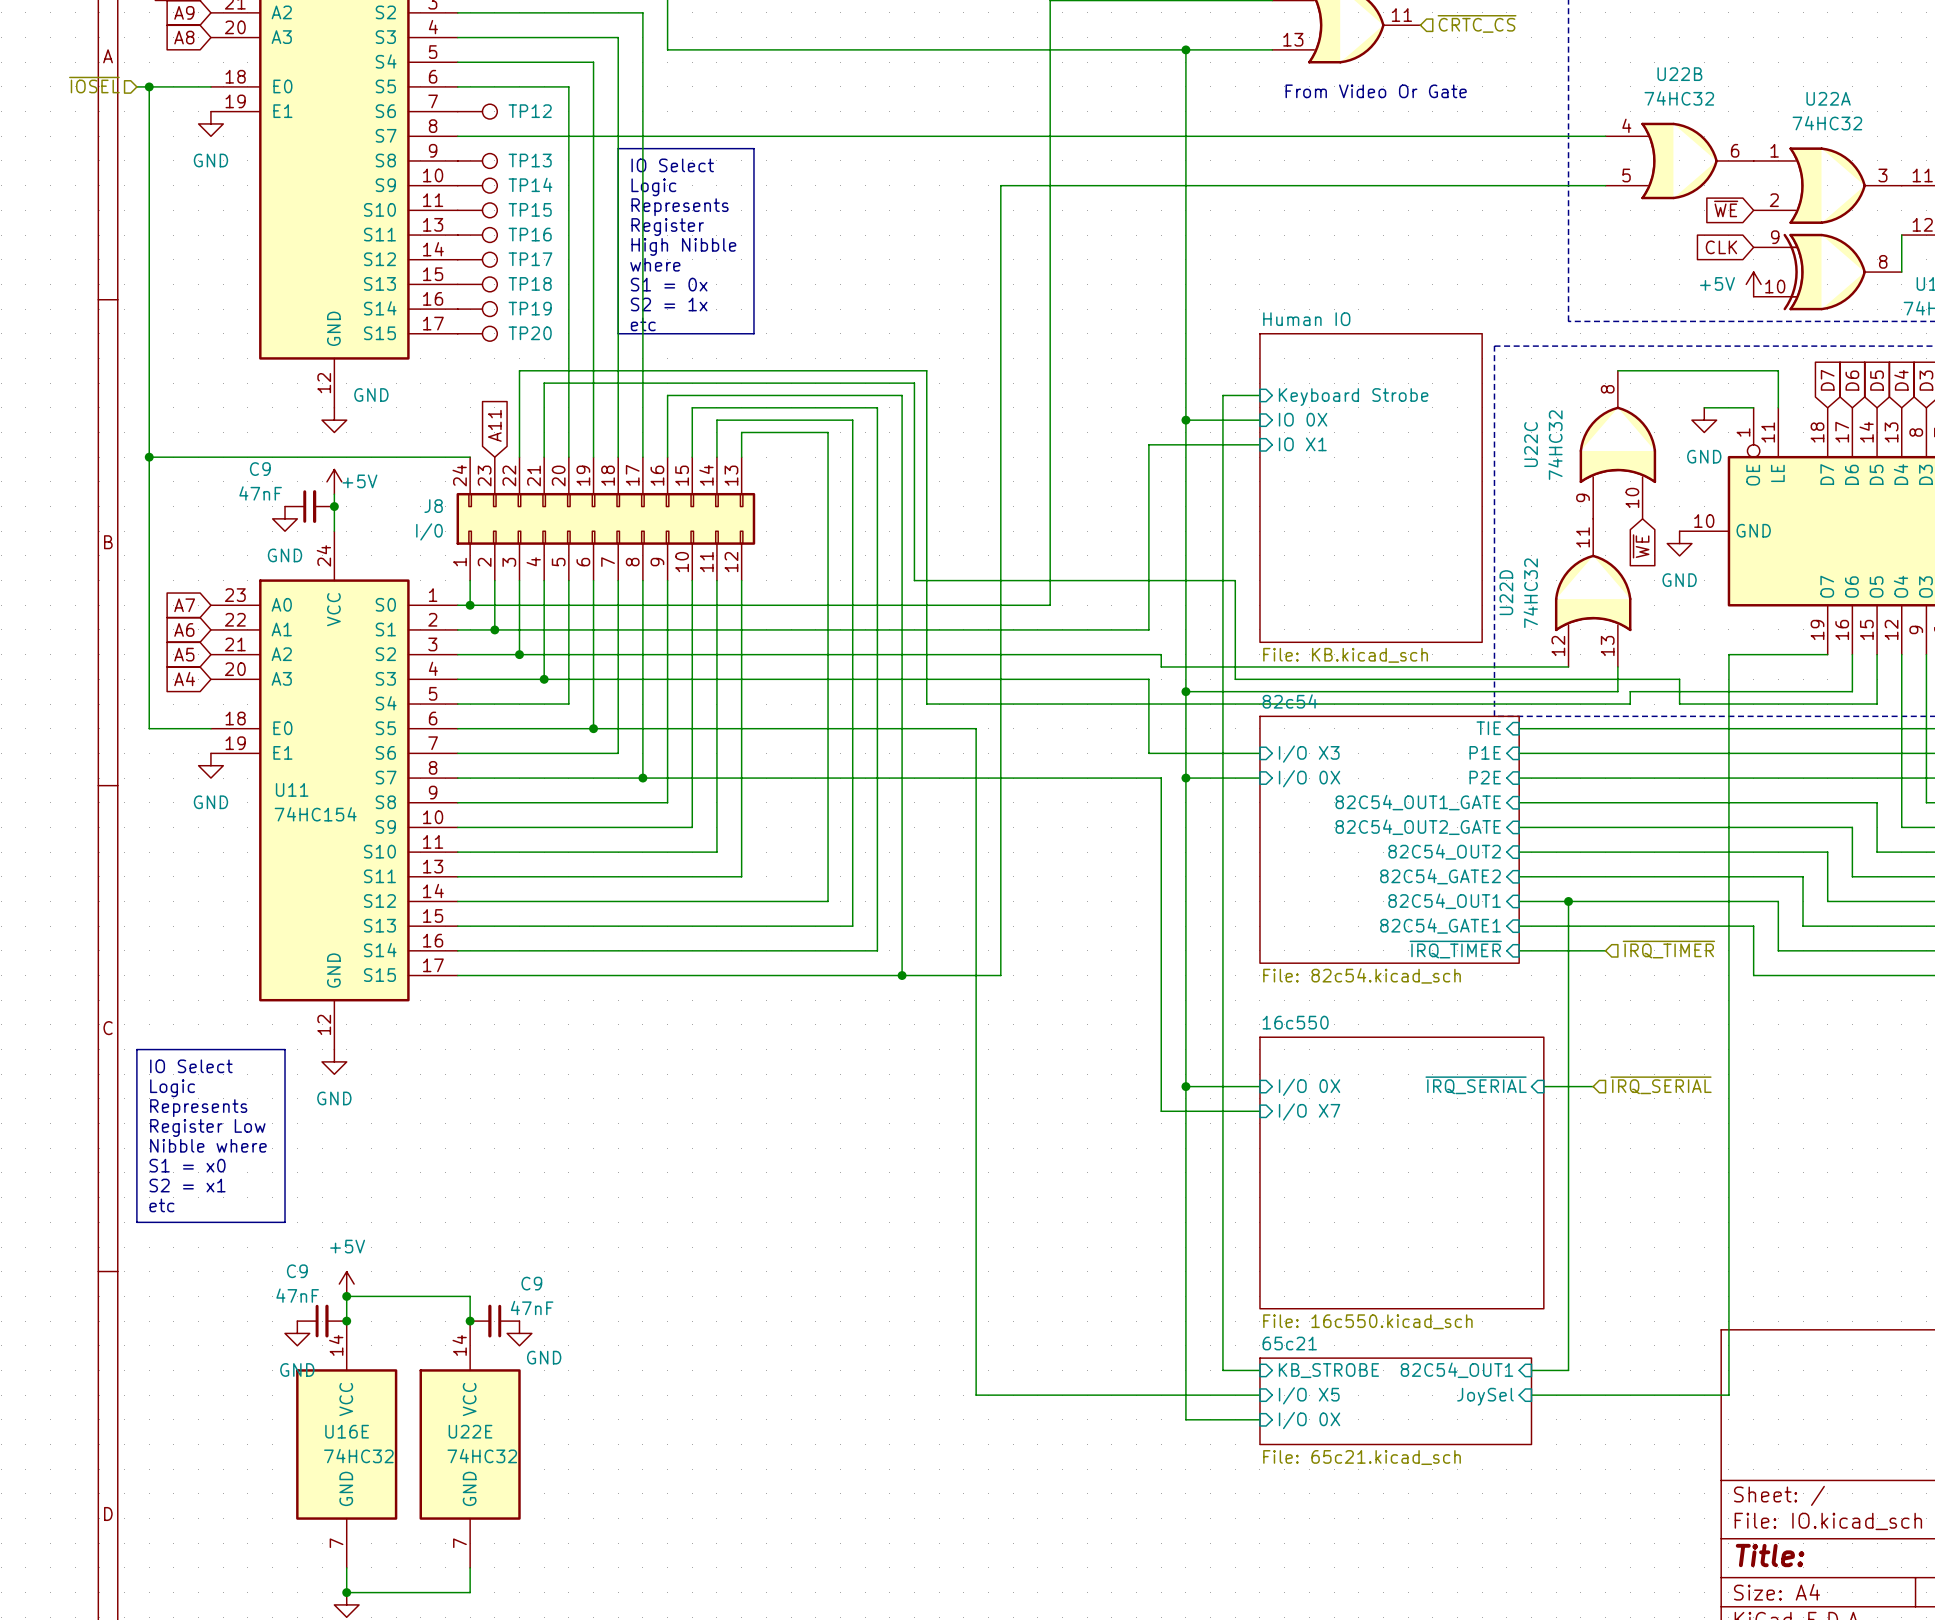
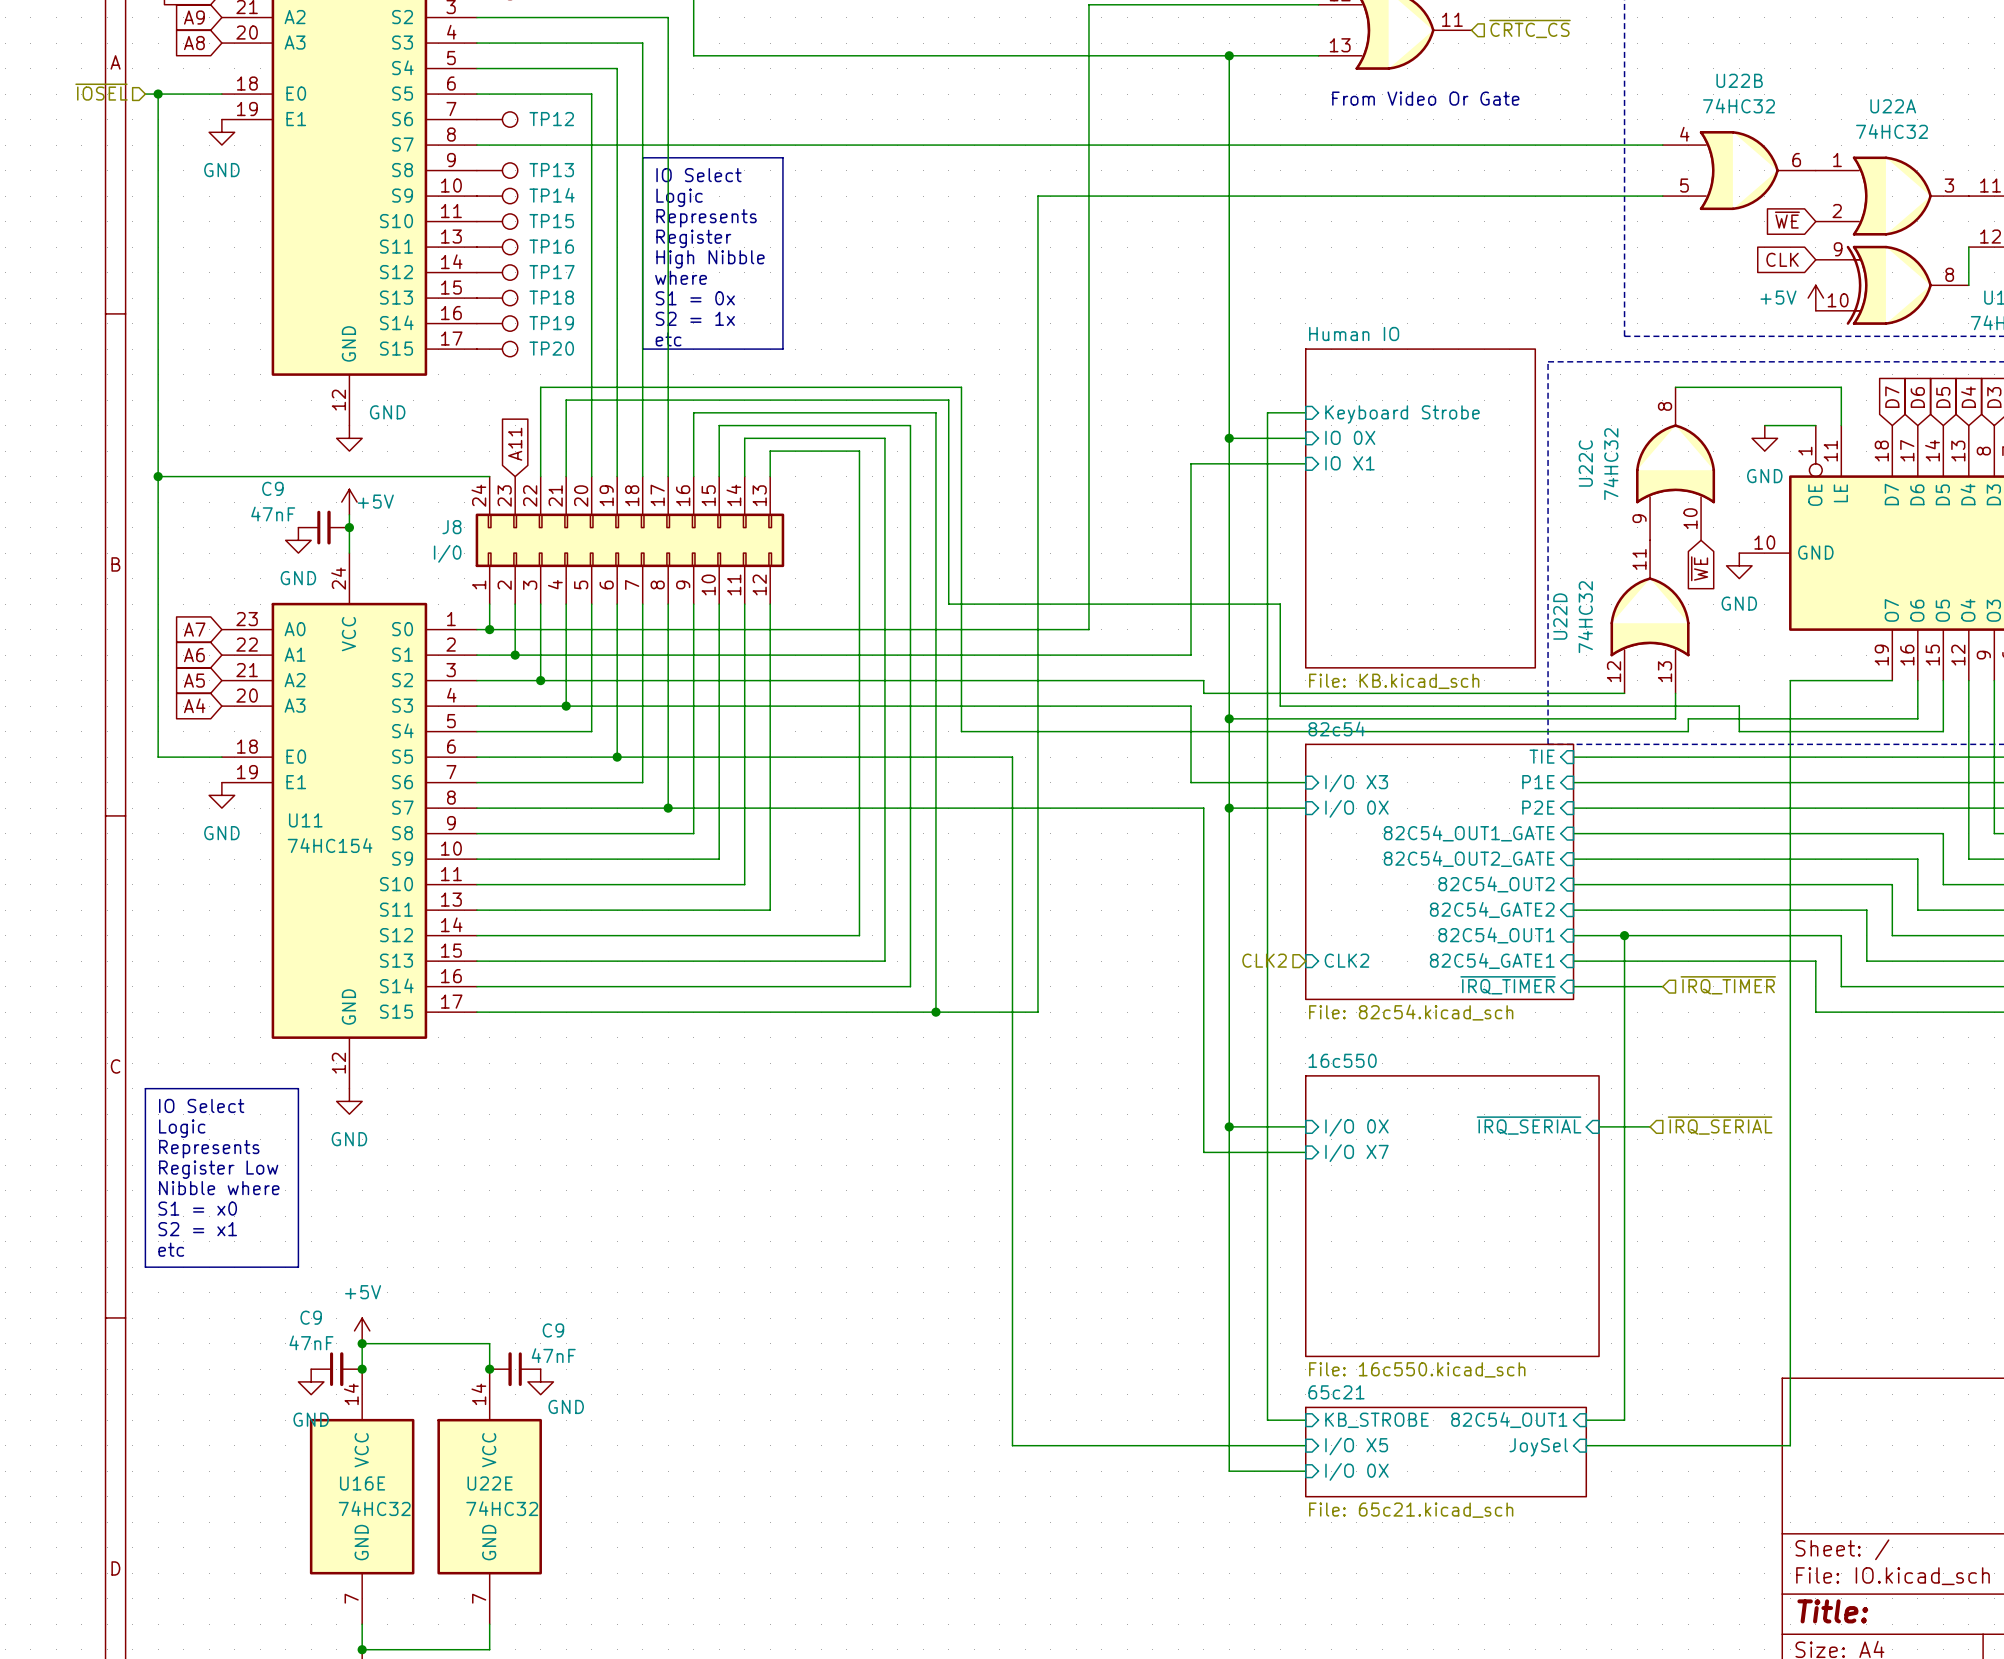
hierarchical label: none -> CLK2 (1264, 960)
sheet pin: none -> CLK2 (1346, 960)

